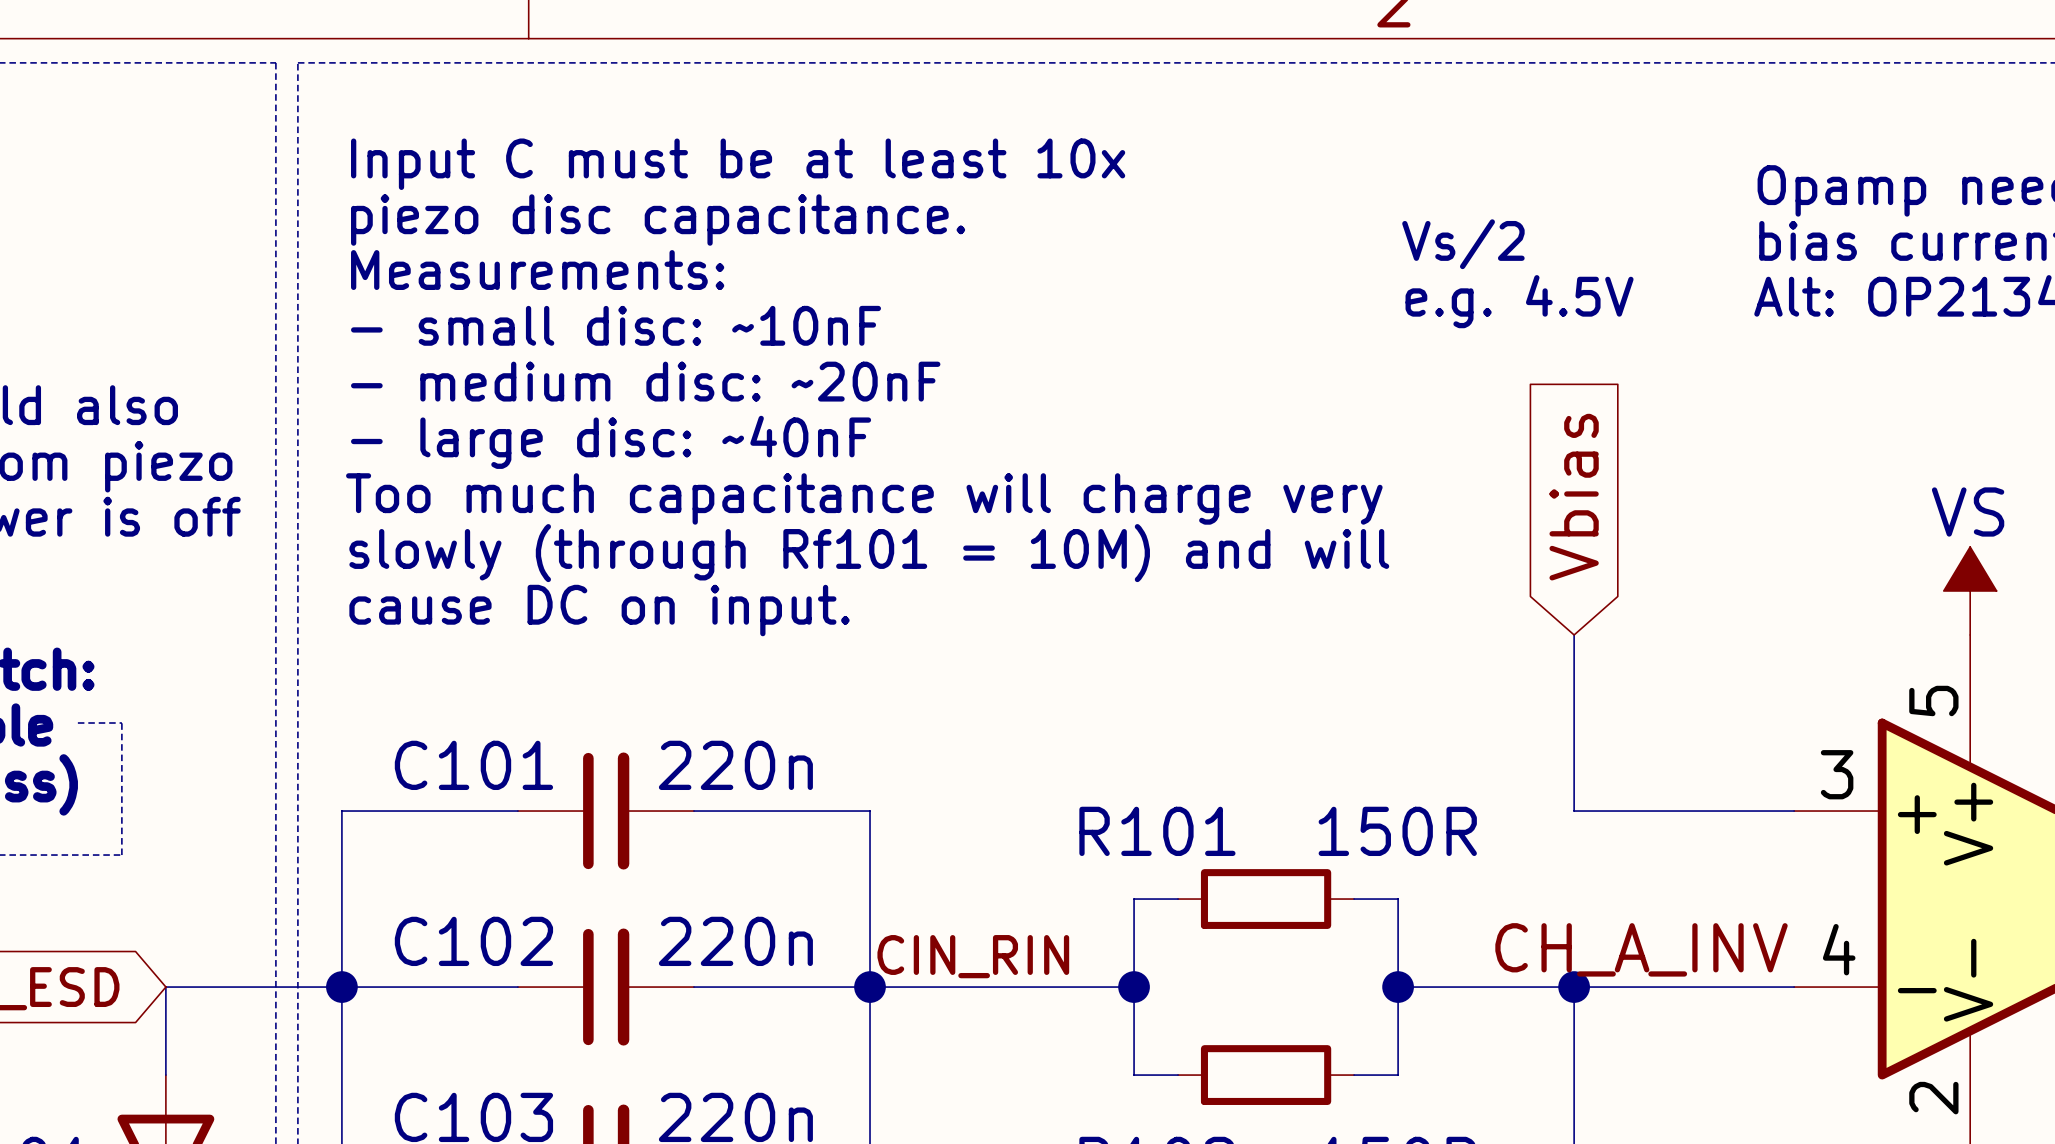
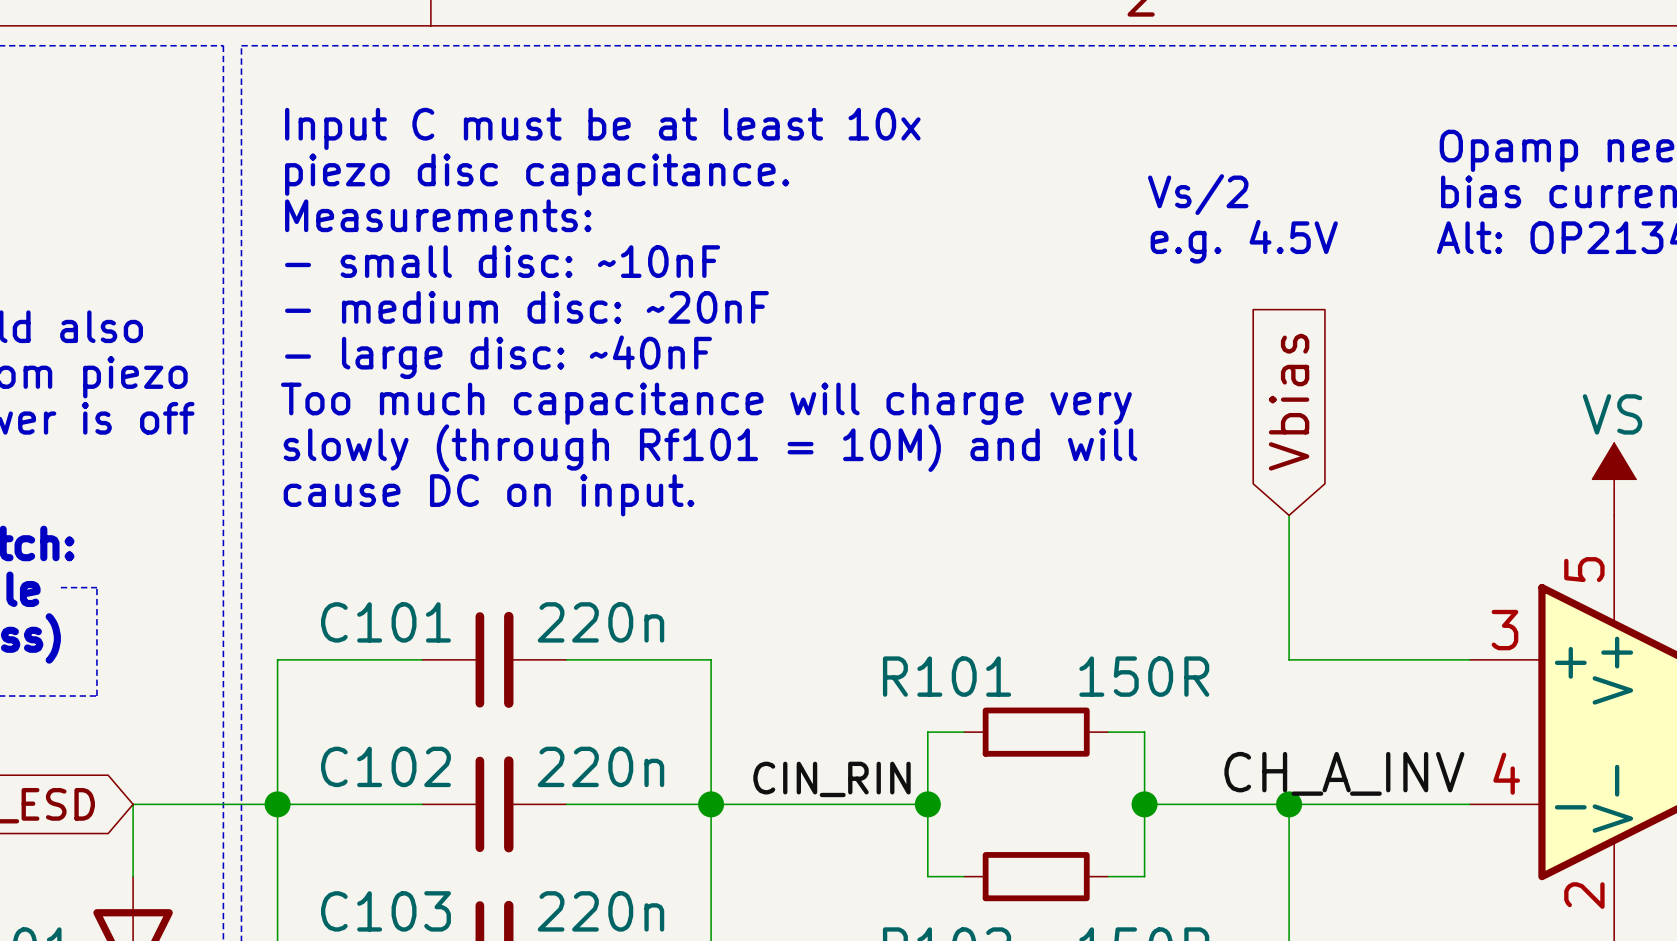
label position: CIN_RIN (973, 956) -> CIN_RIN (832, 779)

